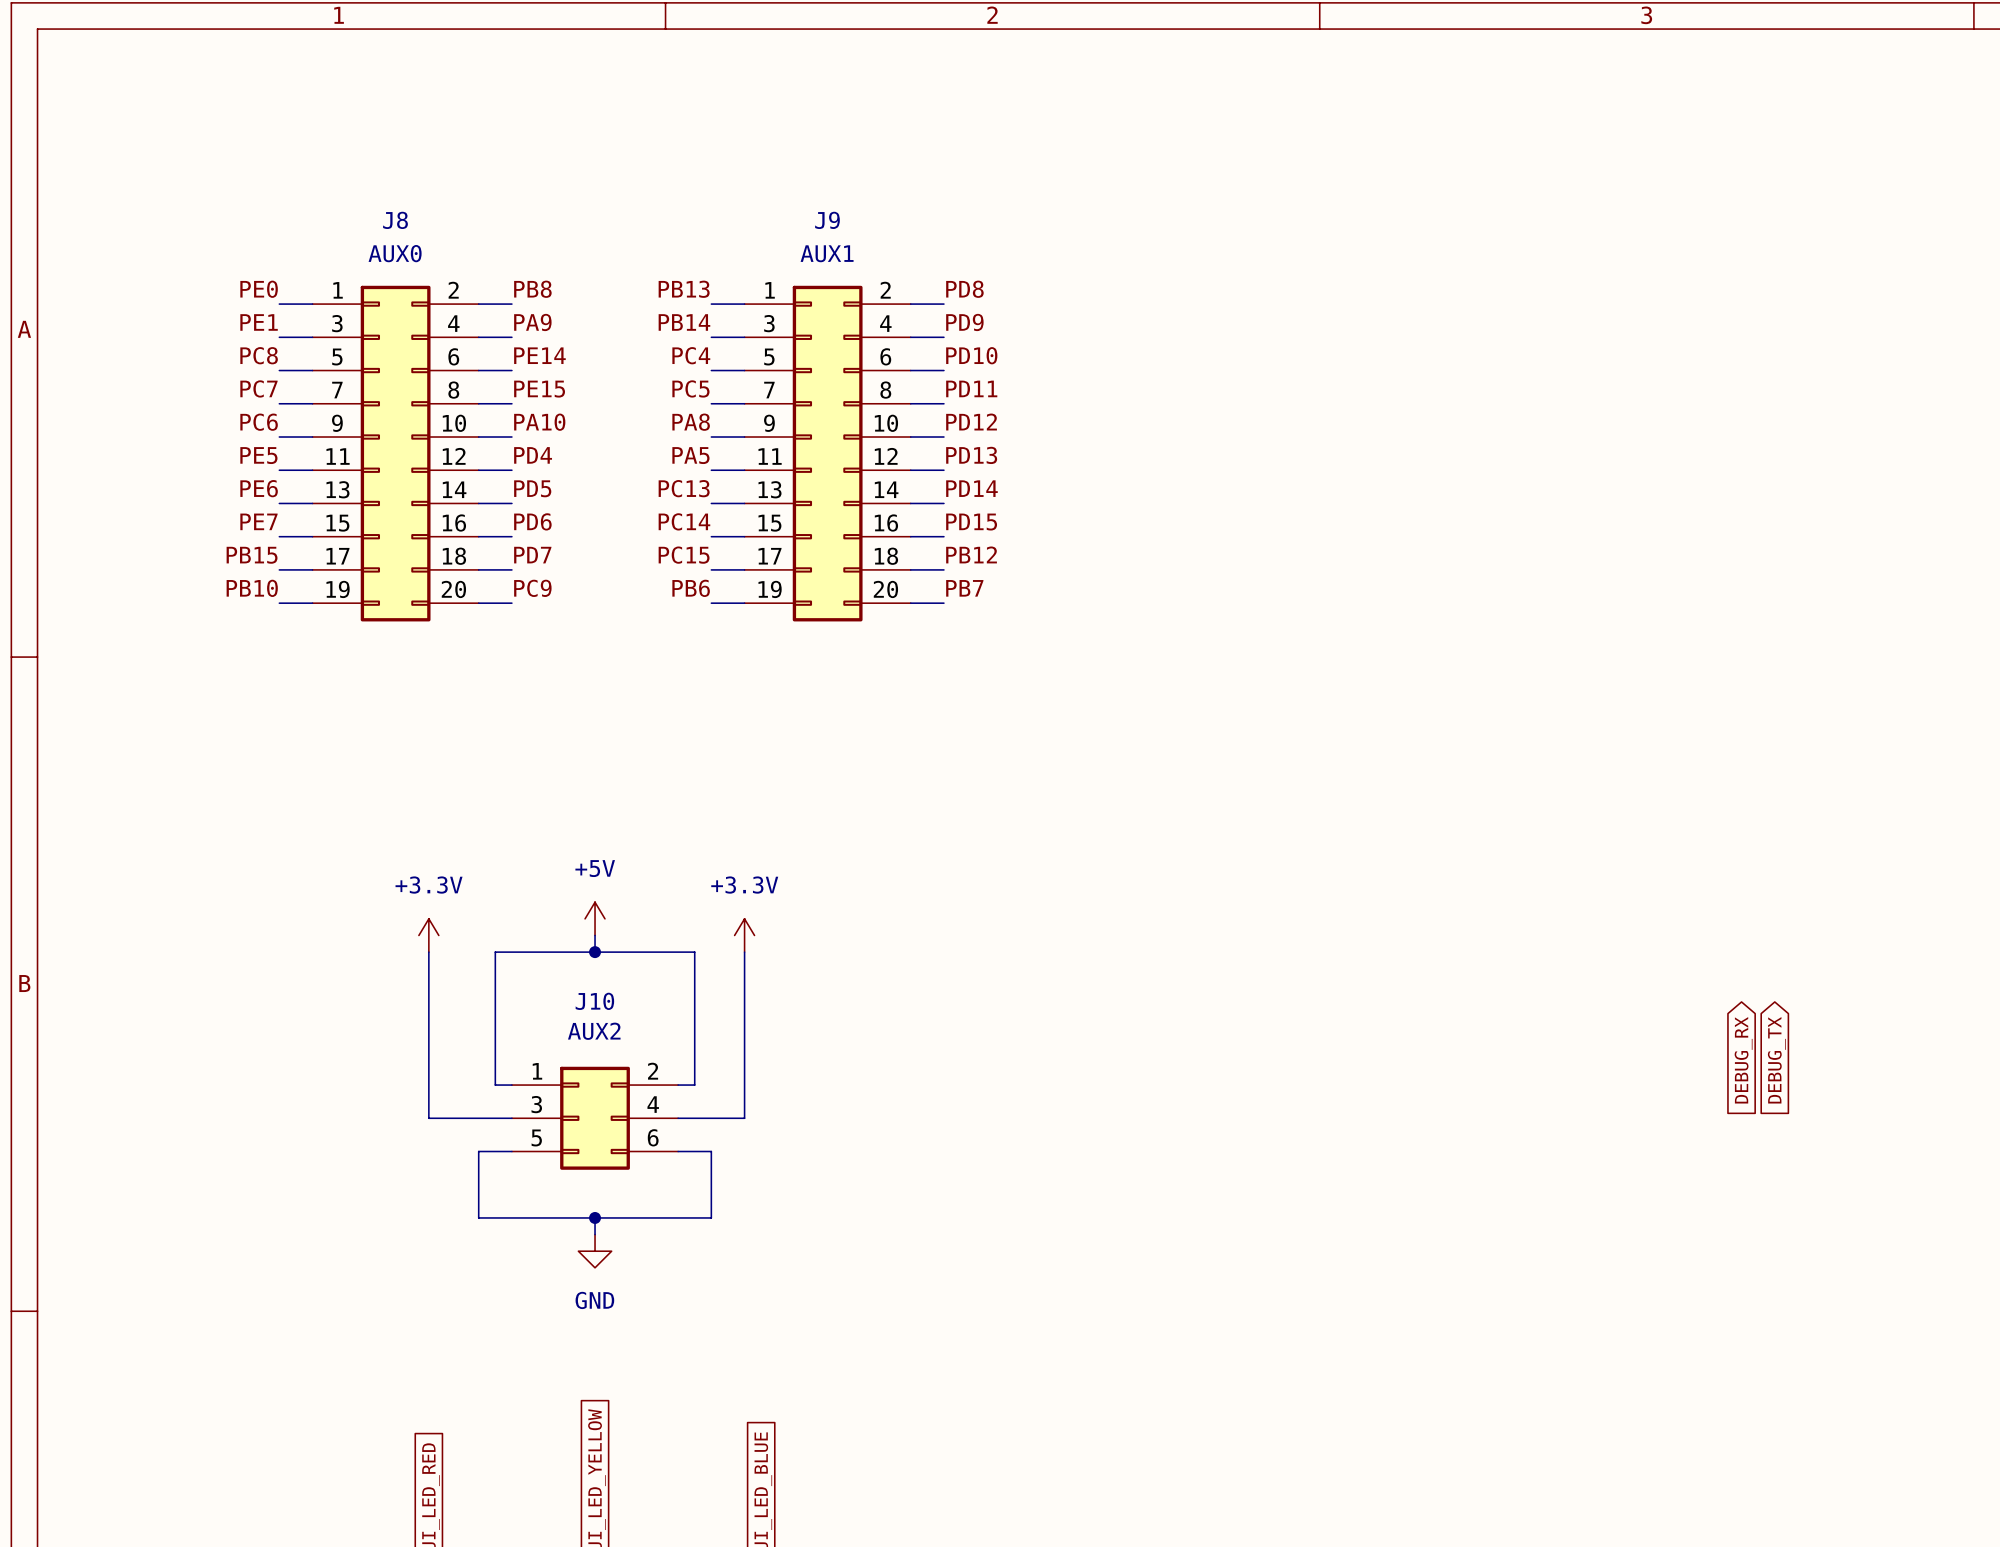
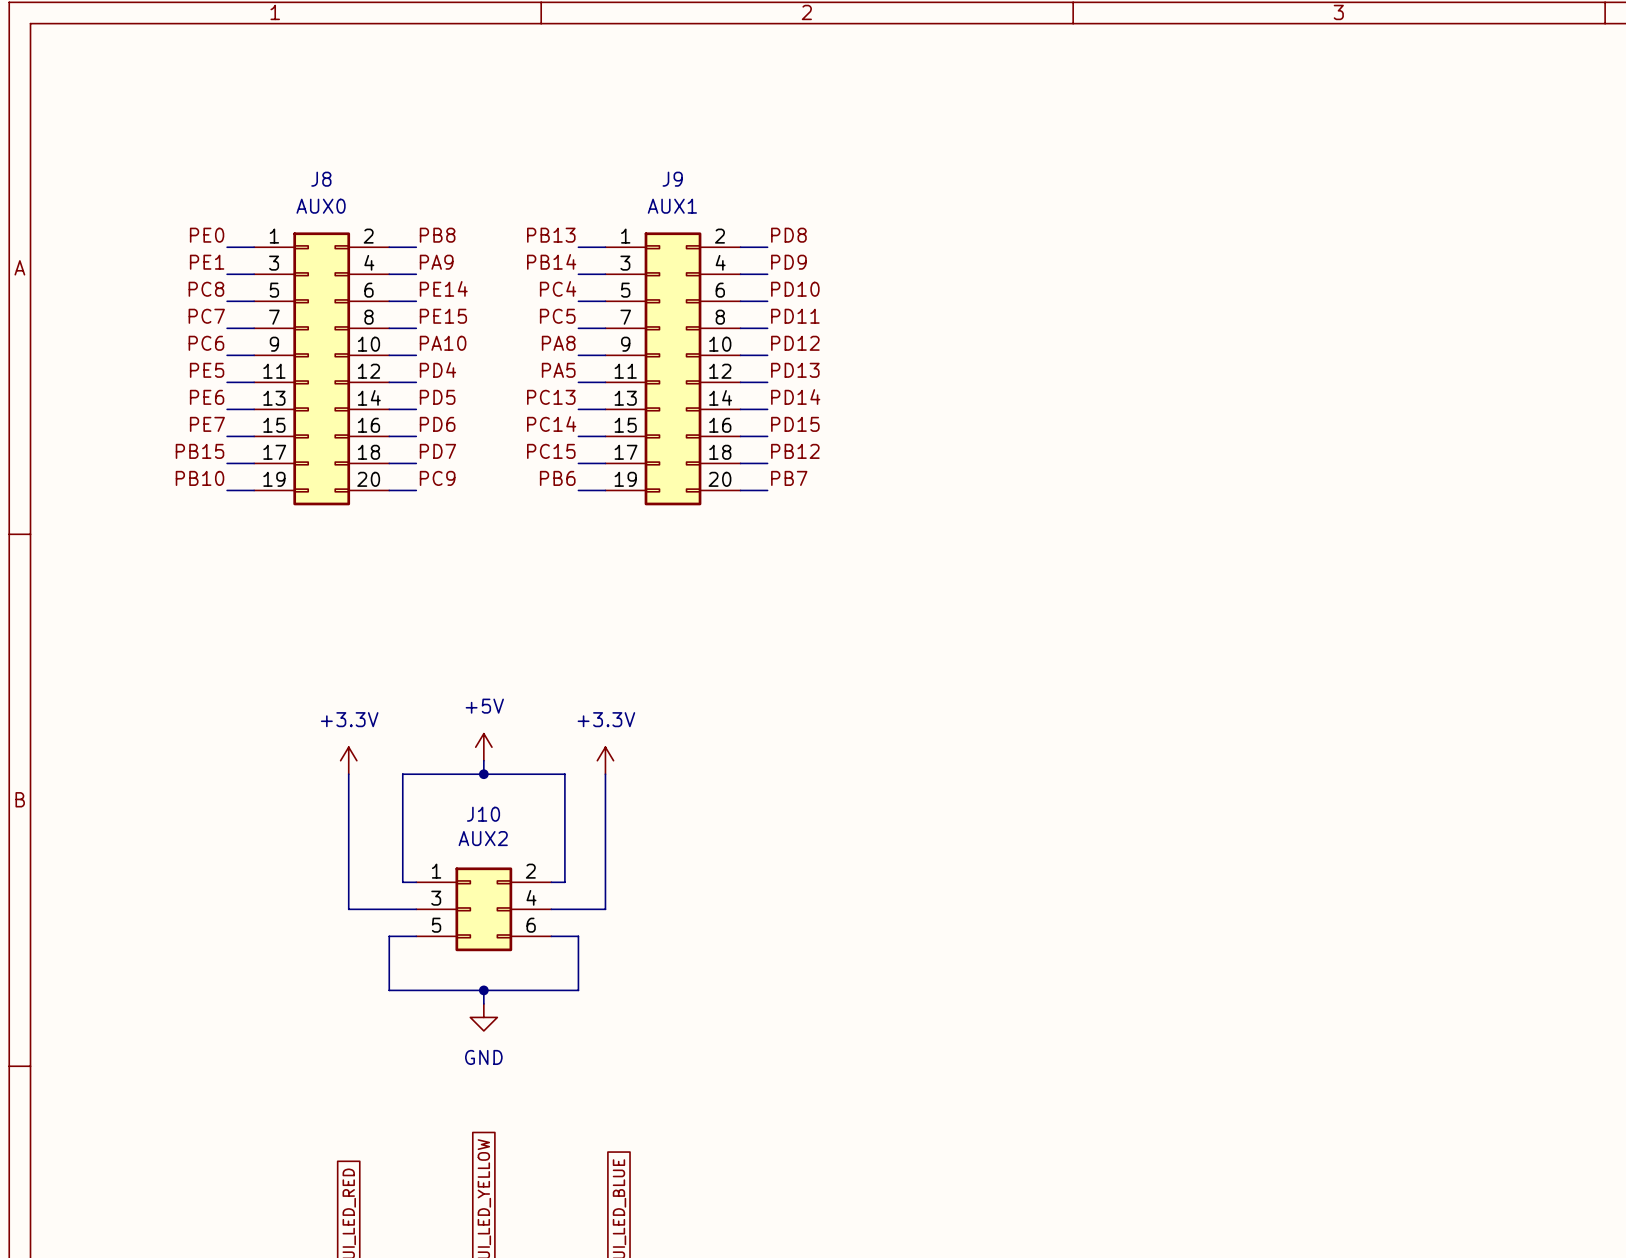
global label: DEBUG_RX (1743, 1060) -> none
global label: DEBUG_TX (1776, 1060) -> none

